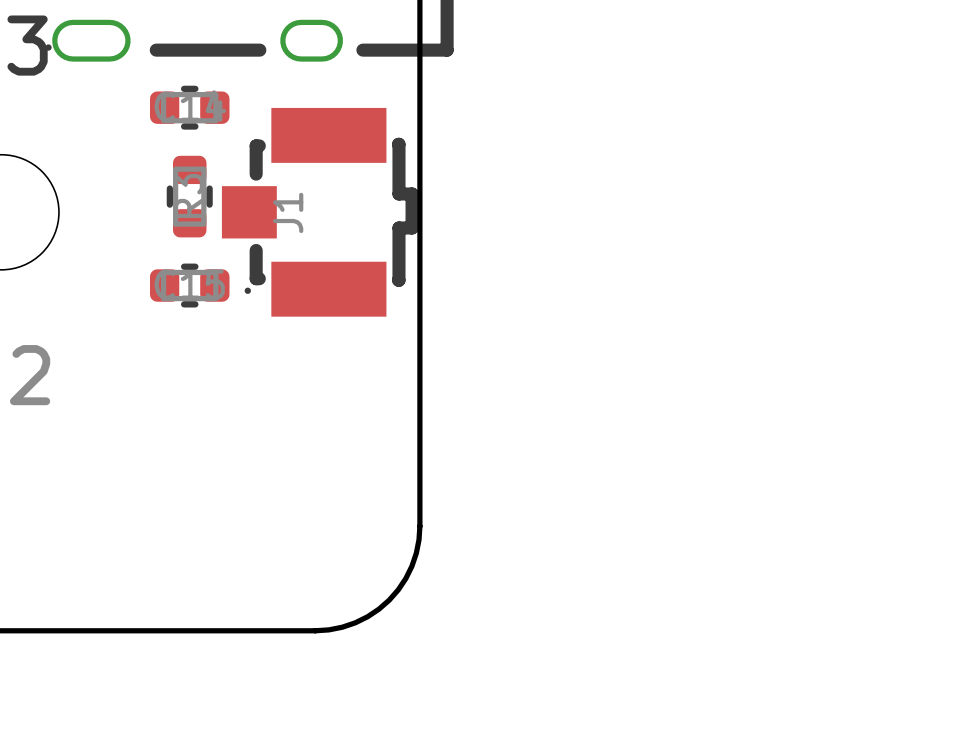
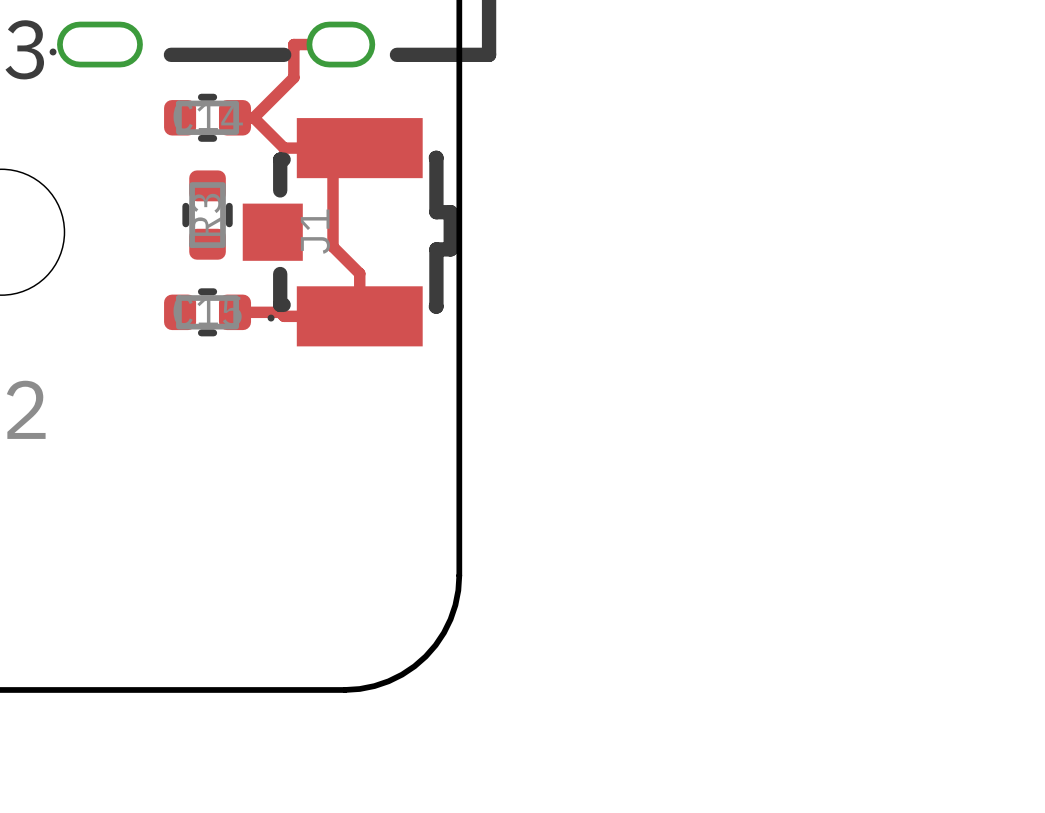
track: none -> (340, 44) (293, 44) (293, 77) (253, 117)
track: none -> (253, 117) (284, 148) (359, 148)
track: none -> (333, 148) (333, 246) (359, 273) (359, 316) (284, 316) (280, 312) (235, 312)

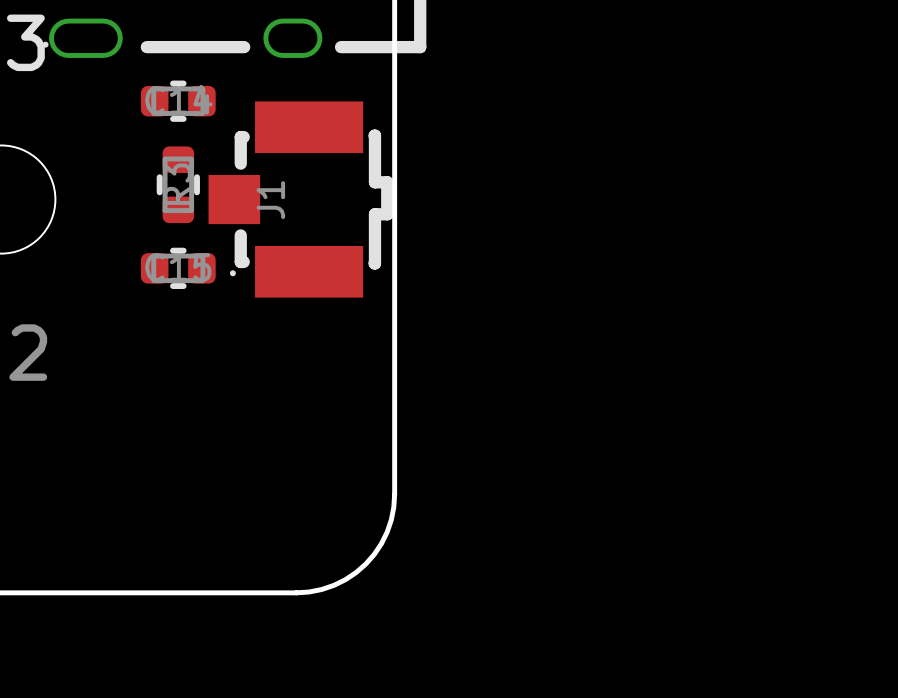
track: (340, 44) (293, 44) (293, 77) (253, 117) -> none
track: (253, 117) (284, 148) (359, 148) -> none
track: (333, 148) (333, 246) (359, 273) (359, 316) (284, 316) (280, 312) (235, 312) -> none

